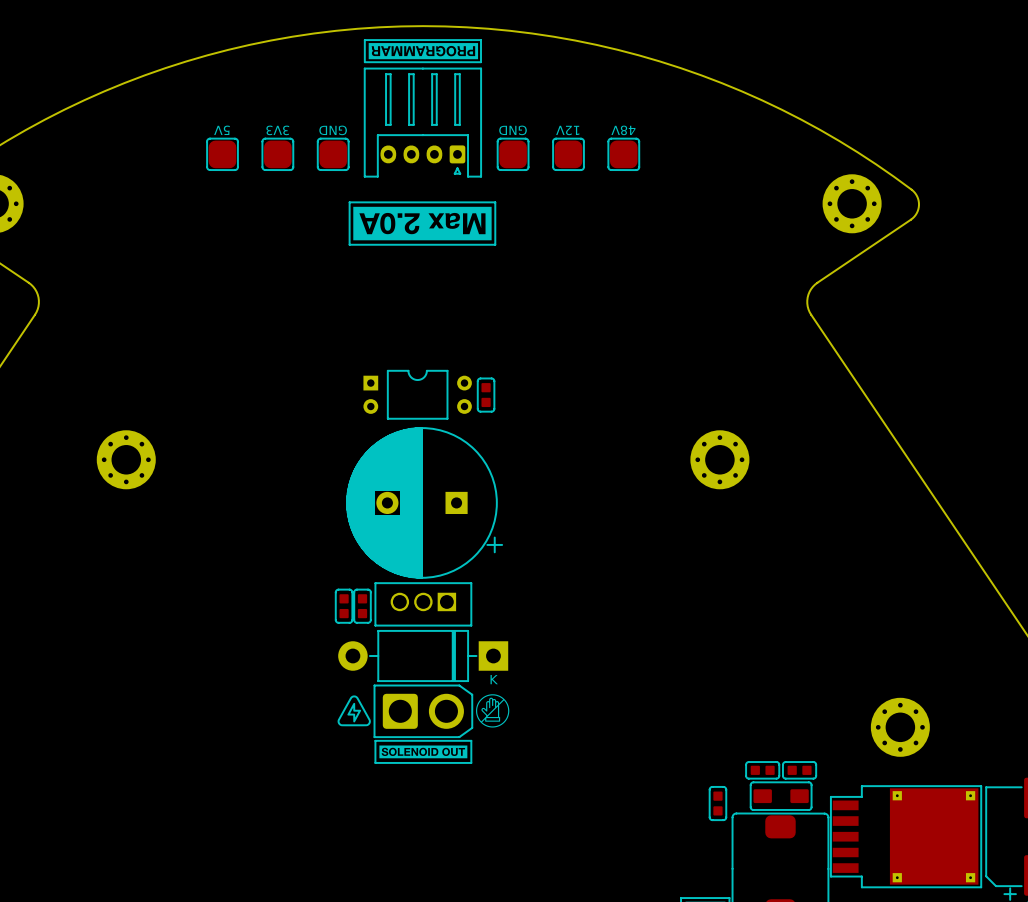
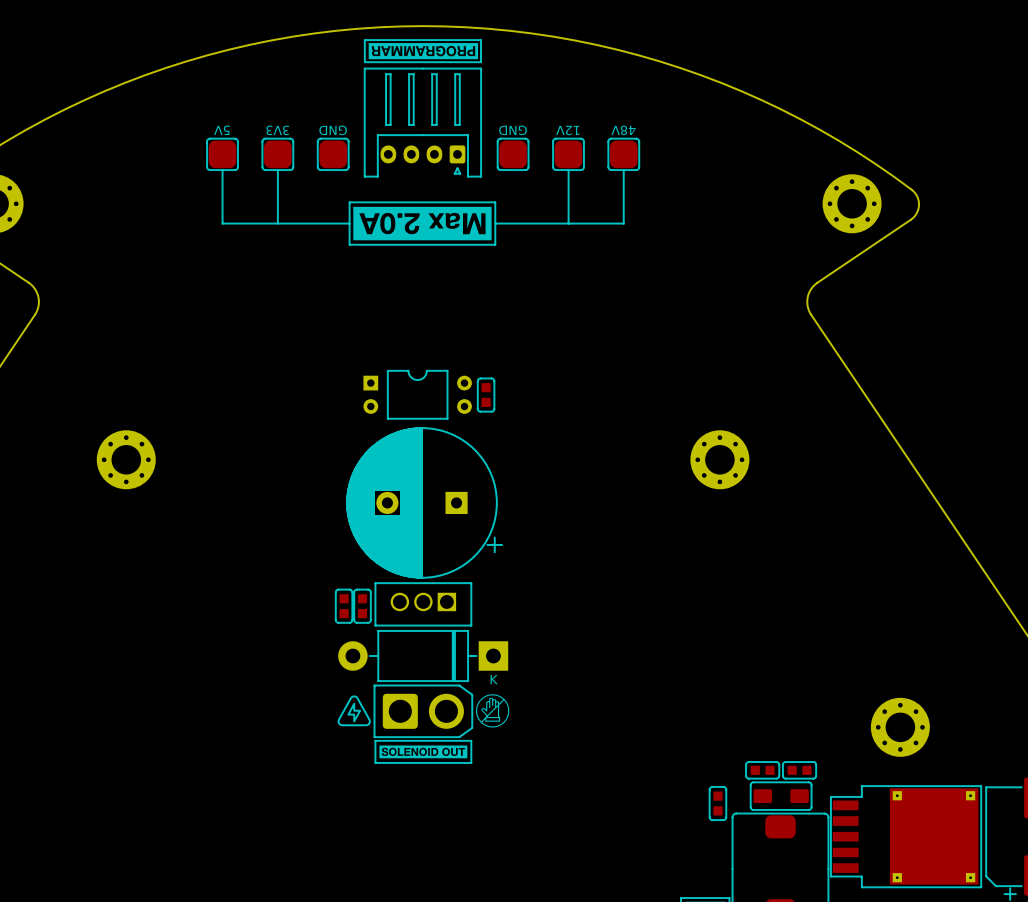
line: none -> (222, 170) (222, 223) (349, 223)
line: none -> (277, 170) (277, 223)
line: none -> (568, 170) (568, 223)
line: none -> (623, 170) (623, 223)
line: none -> (495, 223) (623, 223)

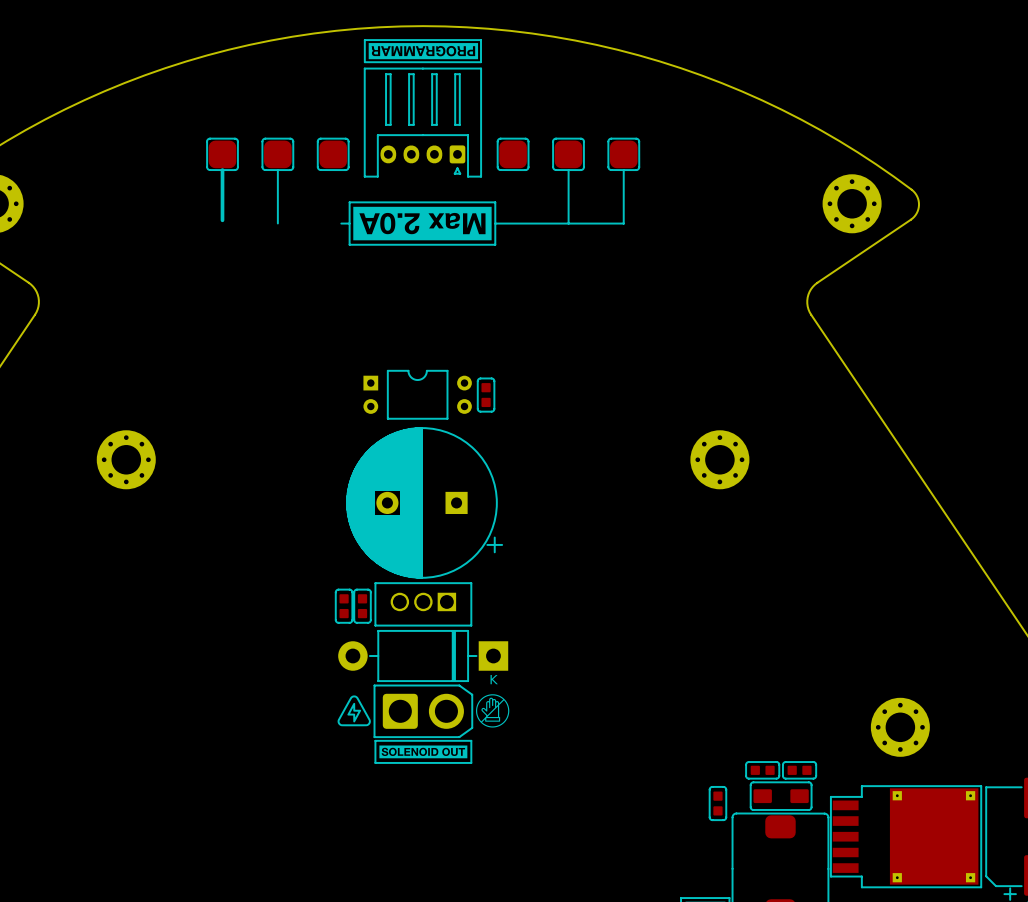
5V name: 5V (221, 130) -> none
3V3 name: 3V3 (277, 130) -> none
GND name: GND (333, 130) -> none
GND name: GND (513, 130) -> none
12V name: 12V (567, 130) -> none
48V name: 48V (623, 130) -> none
line: (222, 170) (222, 223) (341, 223) -> (222, 170) (222, 220)

